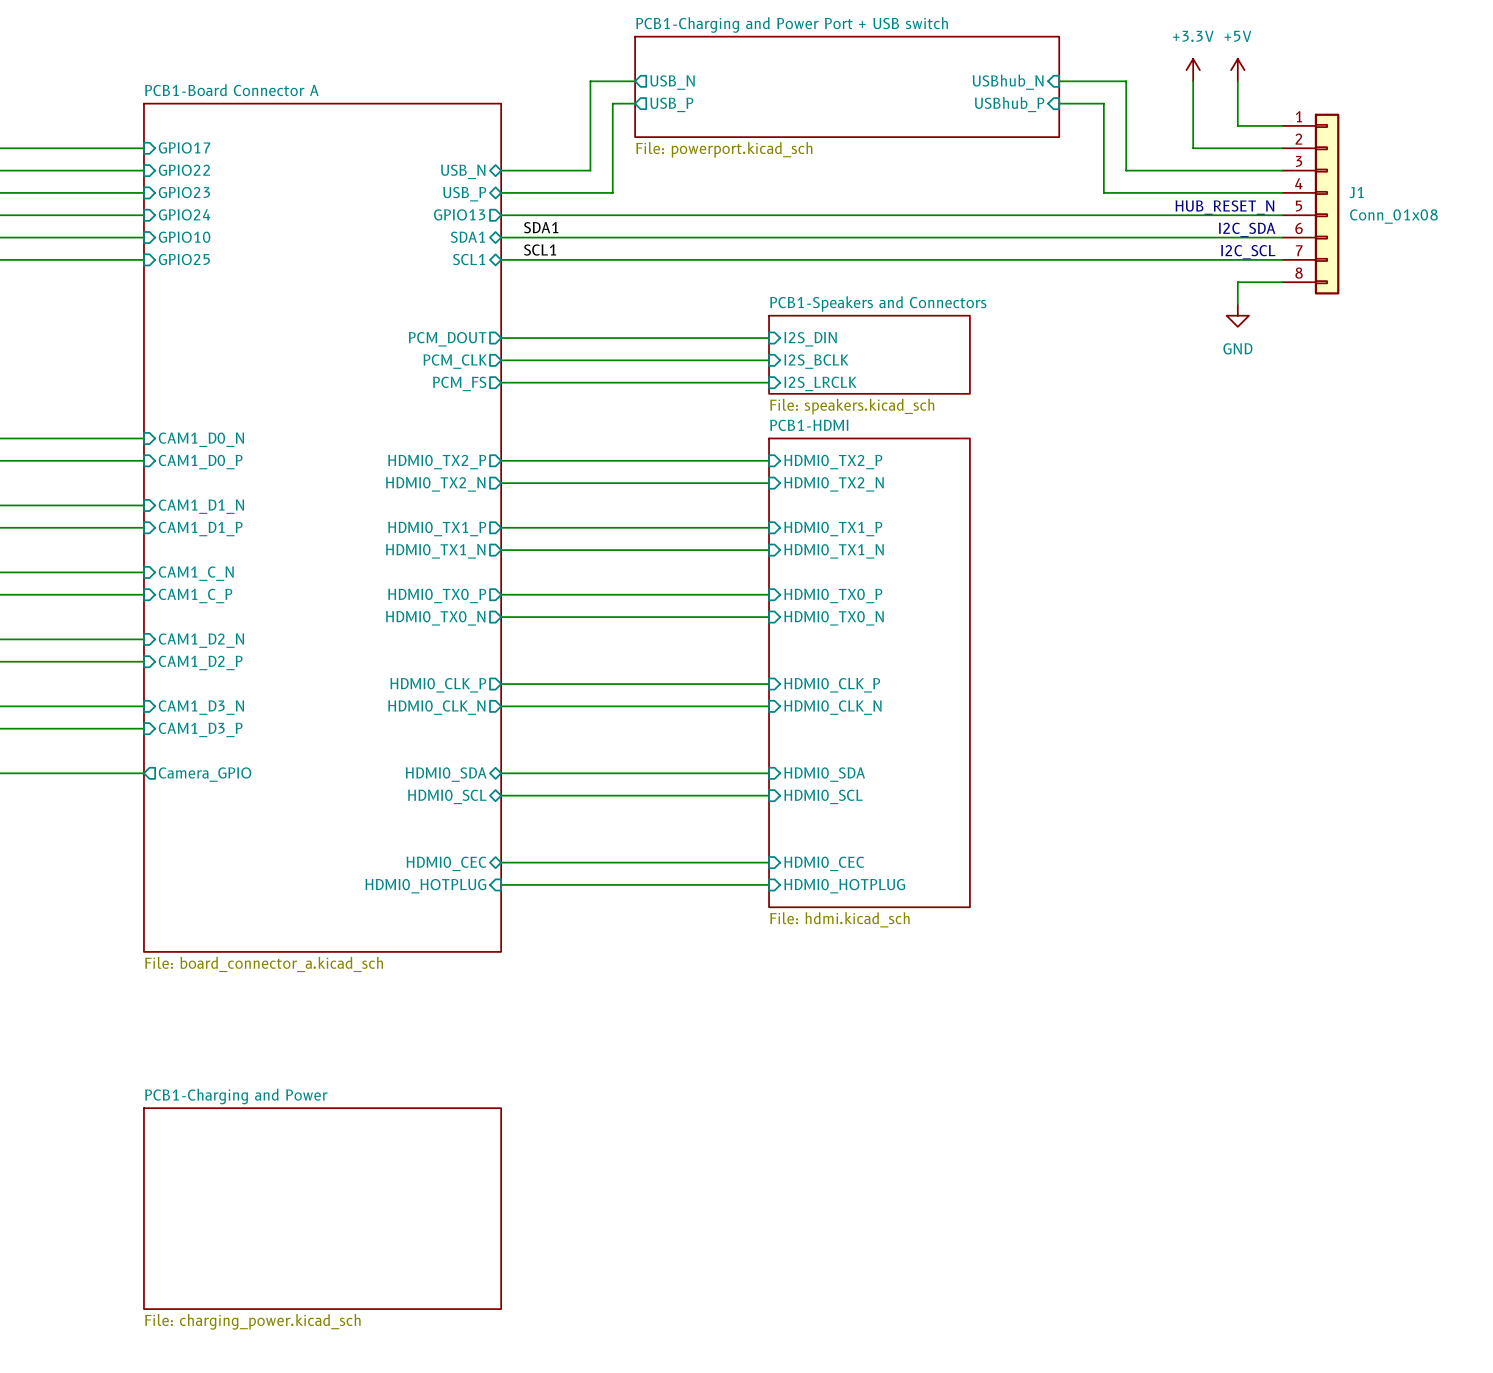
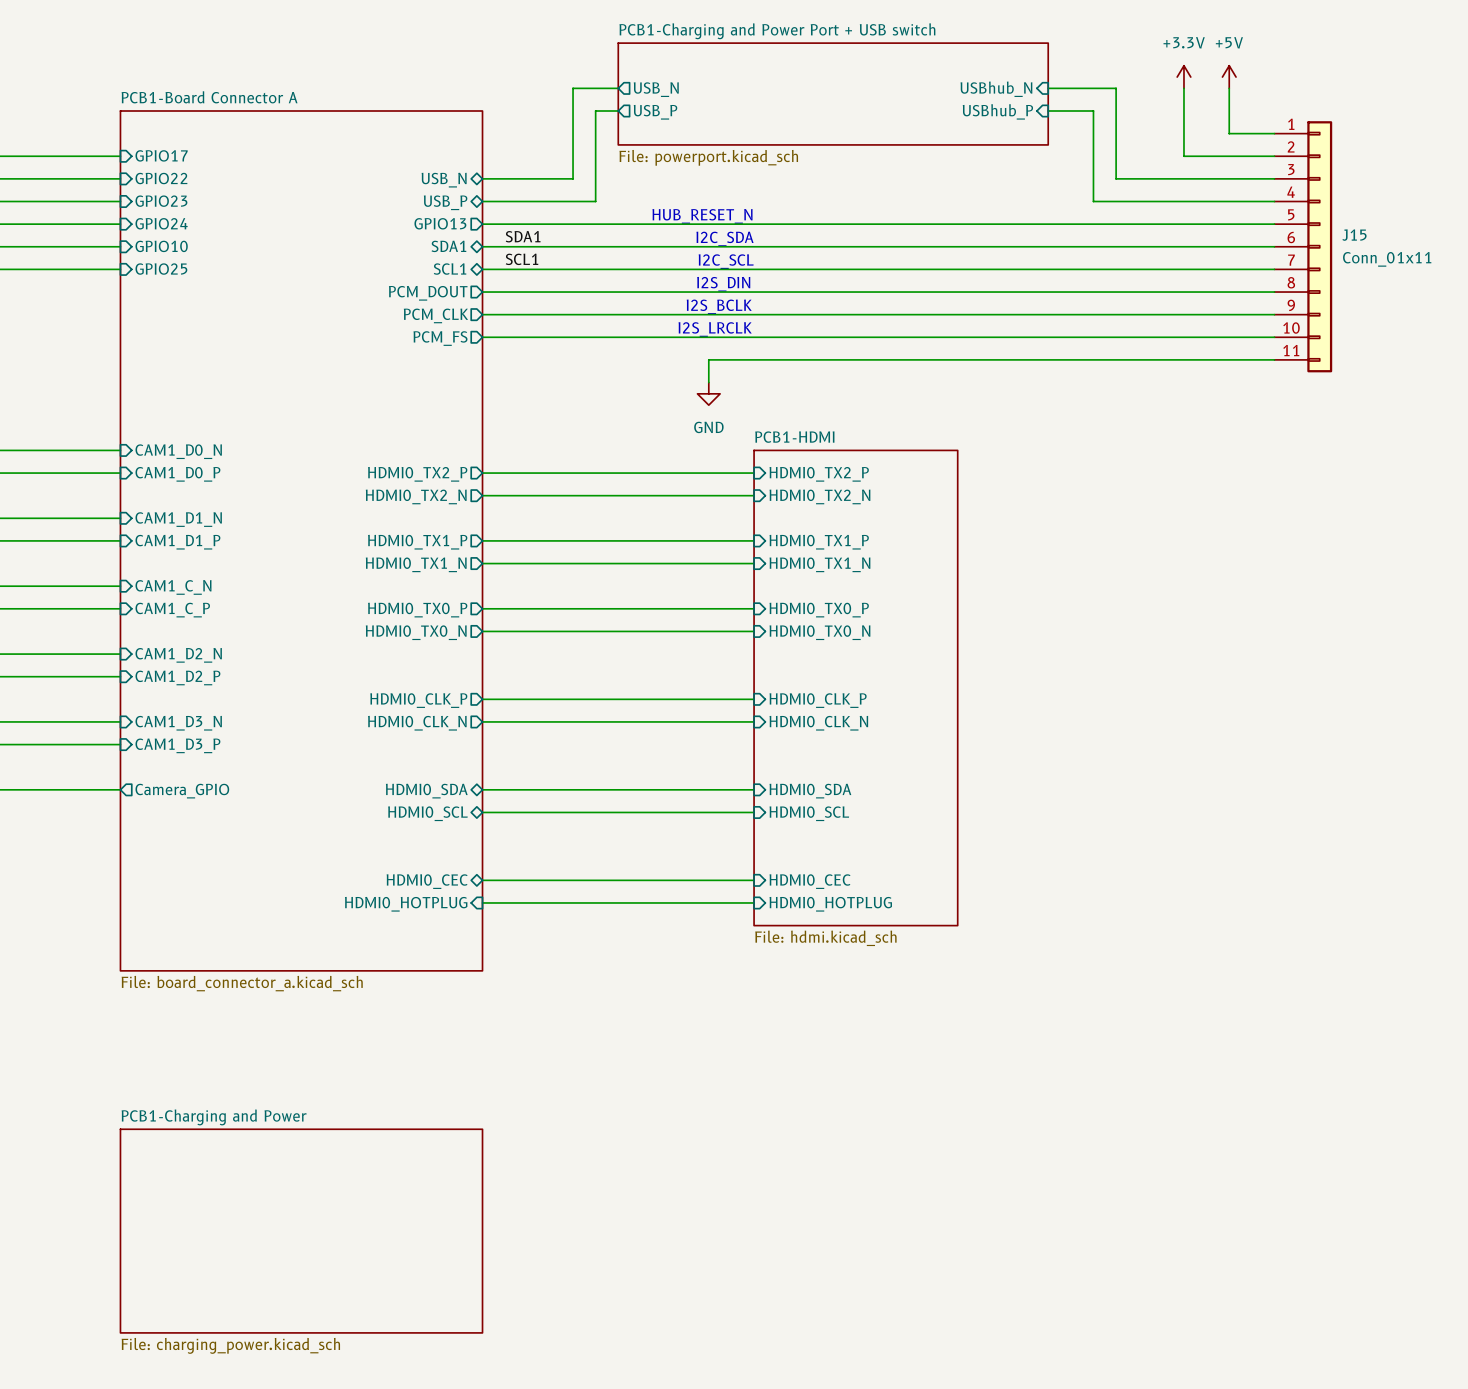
J1: Conn_01x08 (1310, 204) -> none
text: none -> HUB_RESET_N (702, 216)
text: HUB_RESET_N (1224, 207) -> none
text: none -> I2C_SDA (725, 239)
text: I2C_SDA (1247, 229) -> none
J15: none -> Conn_01x11 (1303, 246)
text: none -> I2C_SCL (726, 261)
text: I2C_SCL (1248, 252) -> none
text: none -> I2S_DIN (723, 284)
wire: (1237, 282) (1237, 304) -> (1229, 292) (482, 292)
text: none -> I2S_BCLK (719, 306)
wire: none -> (482, 314) (1274, 314)
power symbol: GND (1237, 315) -> none
text: none -> I2S_LRCLK (715, 329)
wire: none -> (482, 337) (1274, 337)
wire: (501, 338) (769, 338) -> none
sheet pin position: PCM_DOUT (447, 339) -> PCM_DOUT (428, 293)
sheet pin: I2S_DIN (810, 339) -> none
wire: none -> (1274, 359) (708, 359) (708, 382)
sheet PCB1-Speakers and Connectors: File: speakers.kicad_sch (869, 354) -> none
wire: (501, 360) (769, 360) -> none
sheet pin position: PCM_CLK (455, 361) -> PCM_CLK (435, 315)
sheet pin: I2S_BCLK (816, 361) -> none
wire: (501, 382) (769, 382) -> none
power symbol: none -> GND (708, 393)
sheet pin position: PCM_FS (459, 383) -> PCM_FS (440, 338)
sheet pin: I2S_LRCLK (820, 383) -> none

